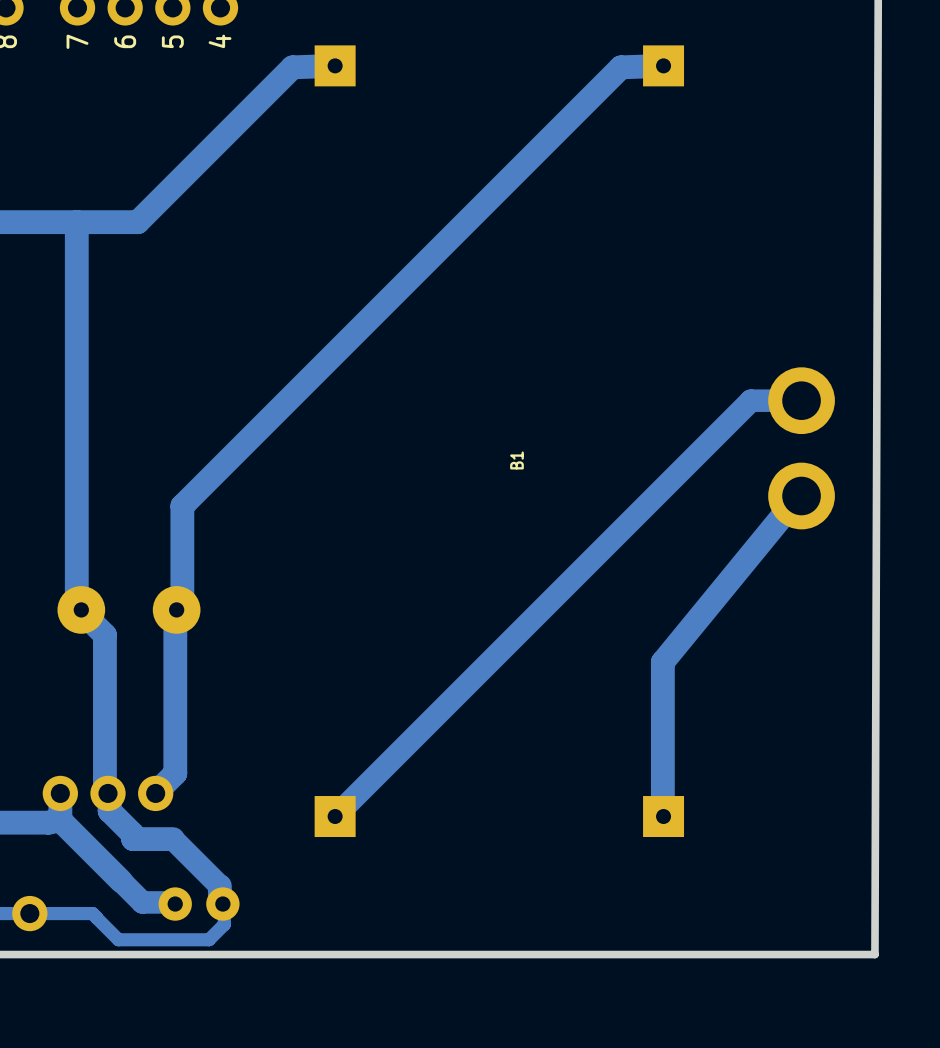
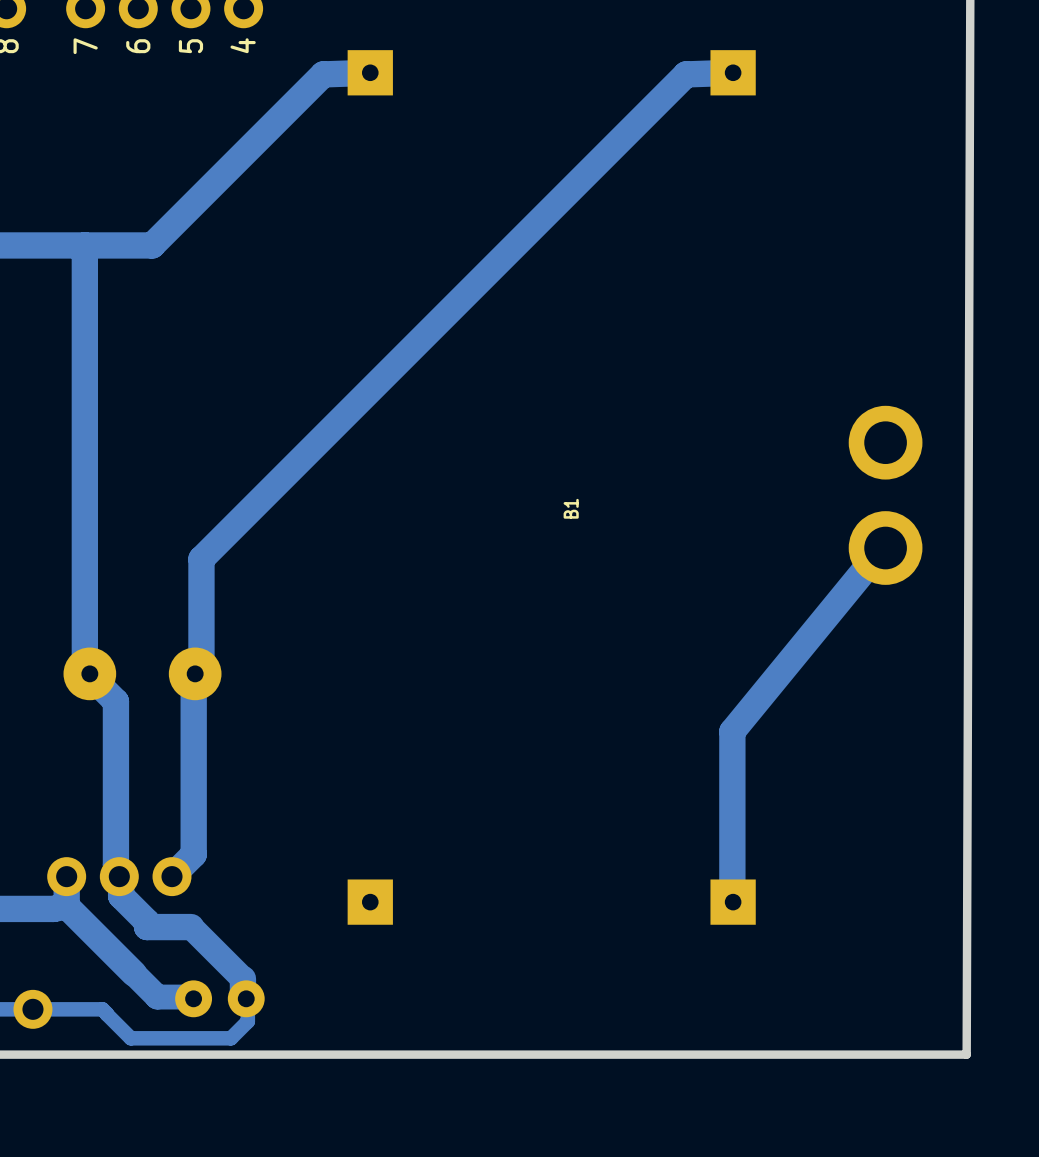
track: (801, 400) (750, 400) (335, 816) -> none

